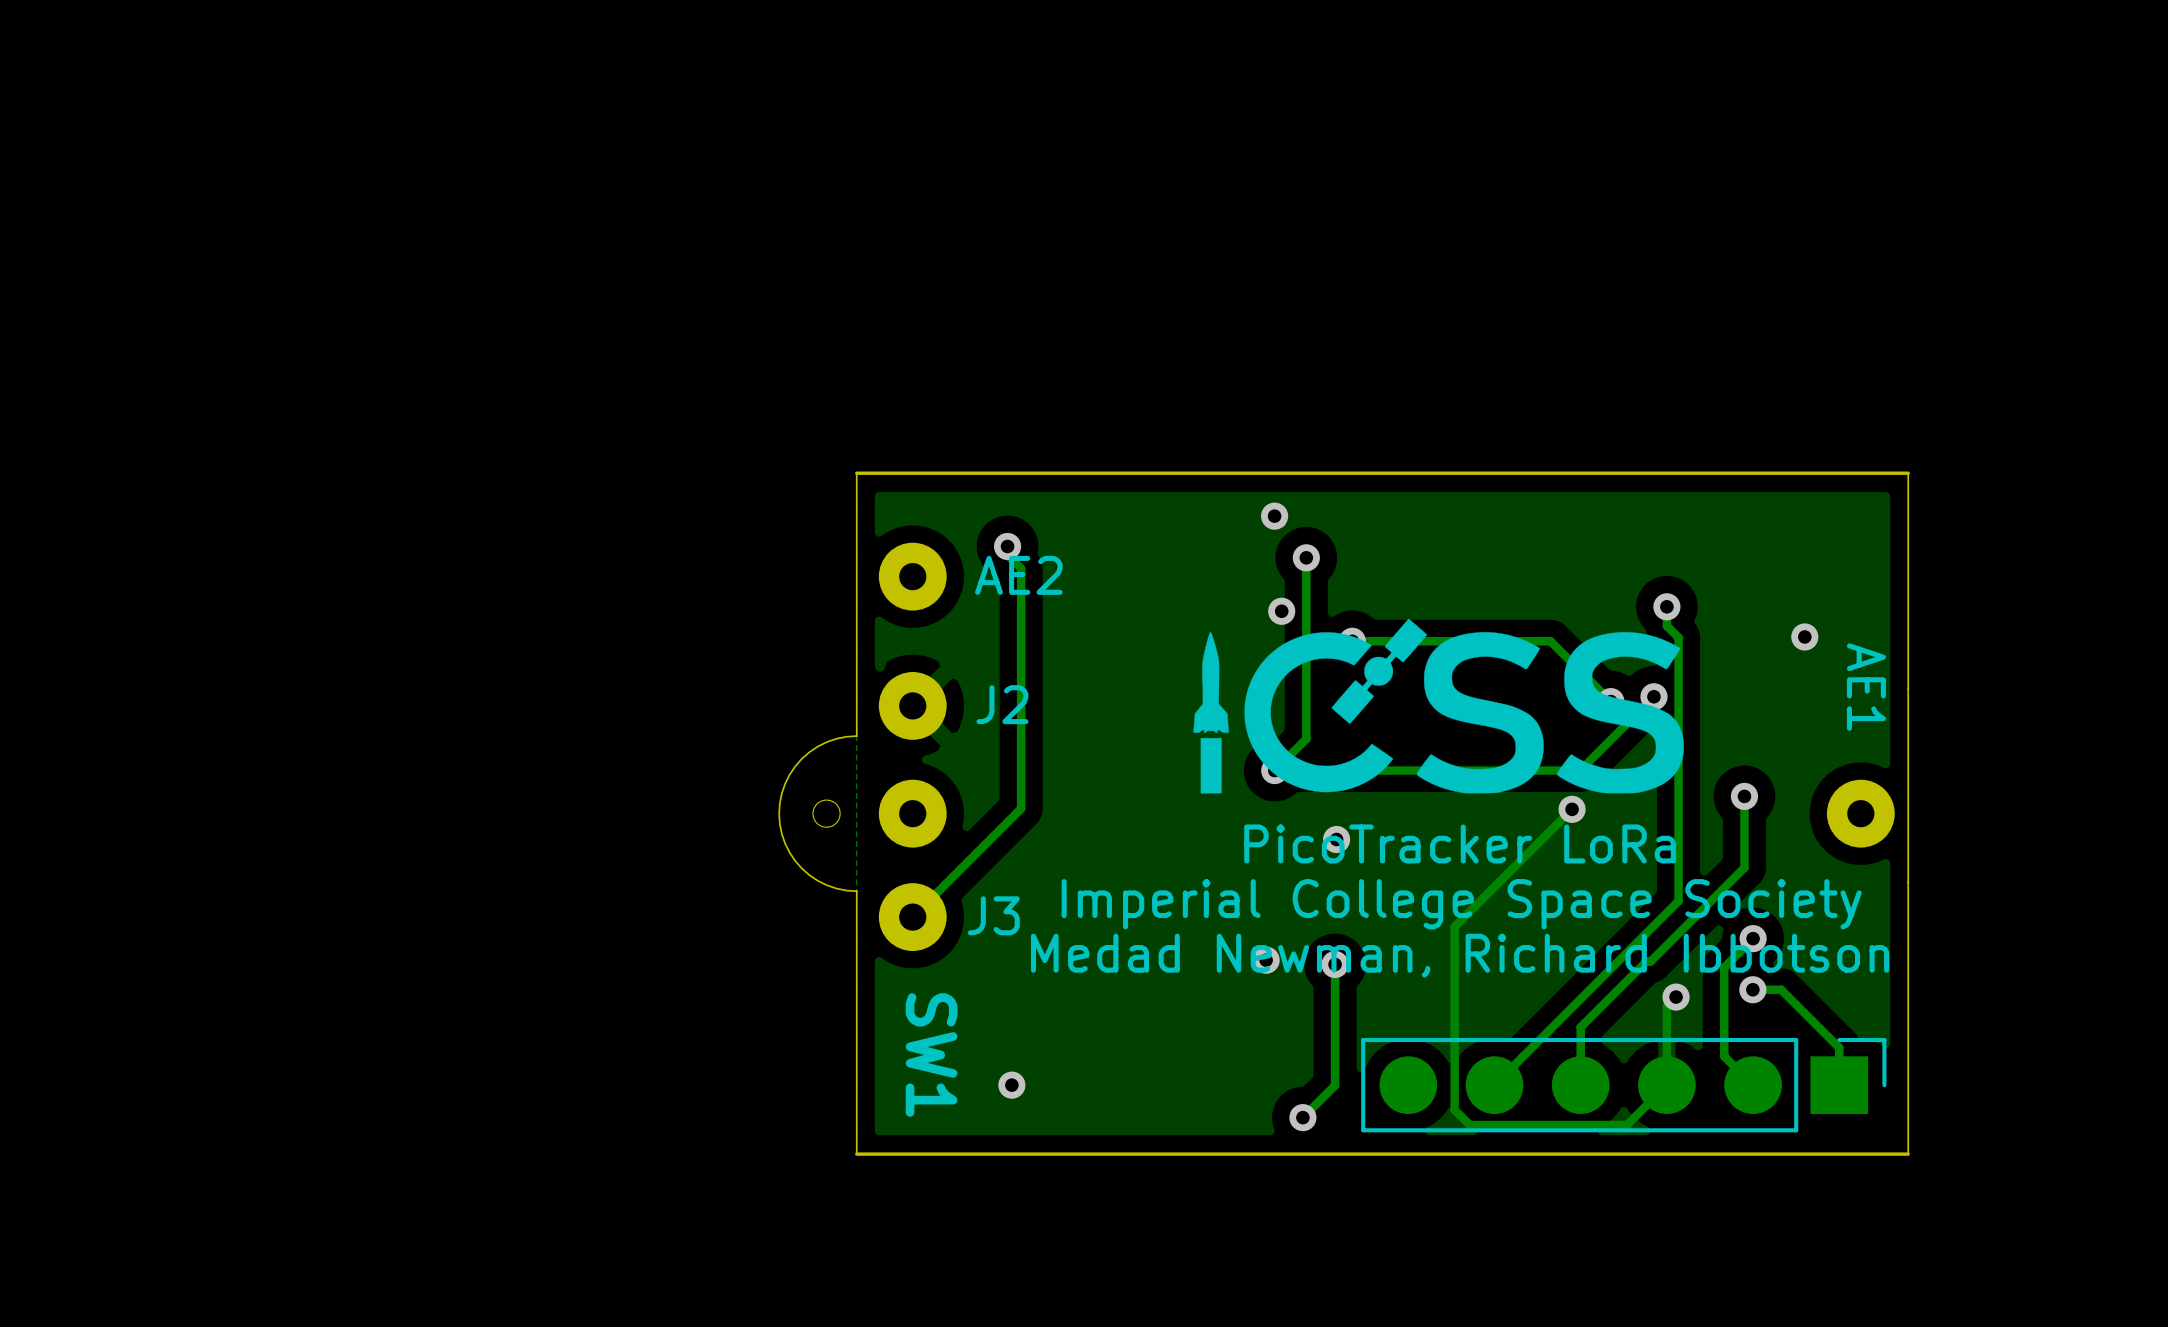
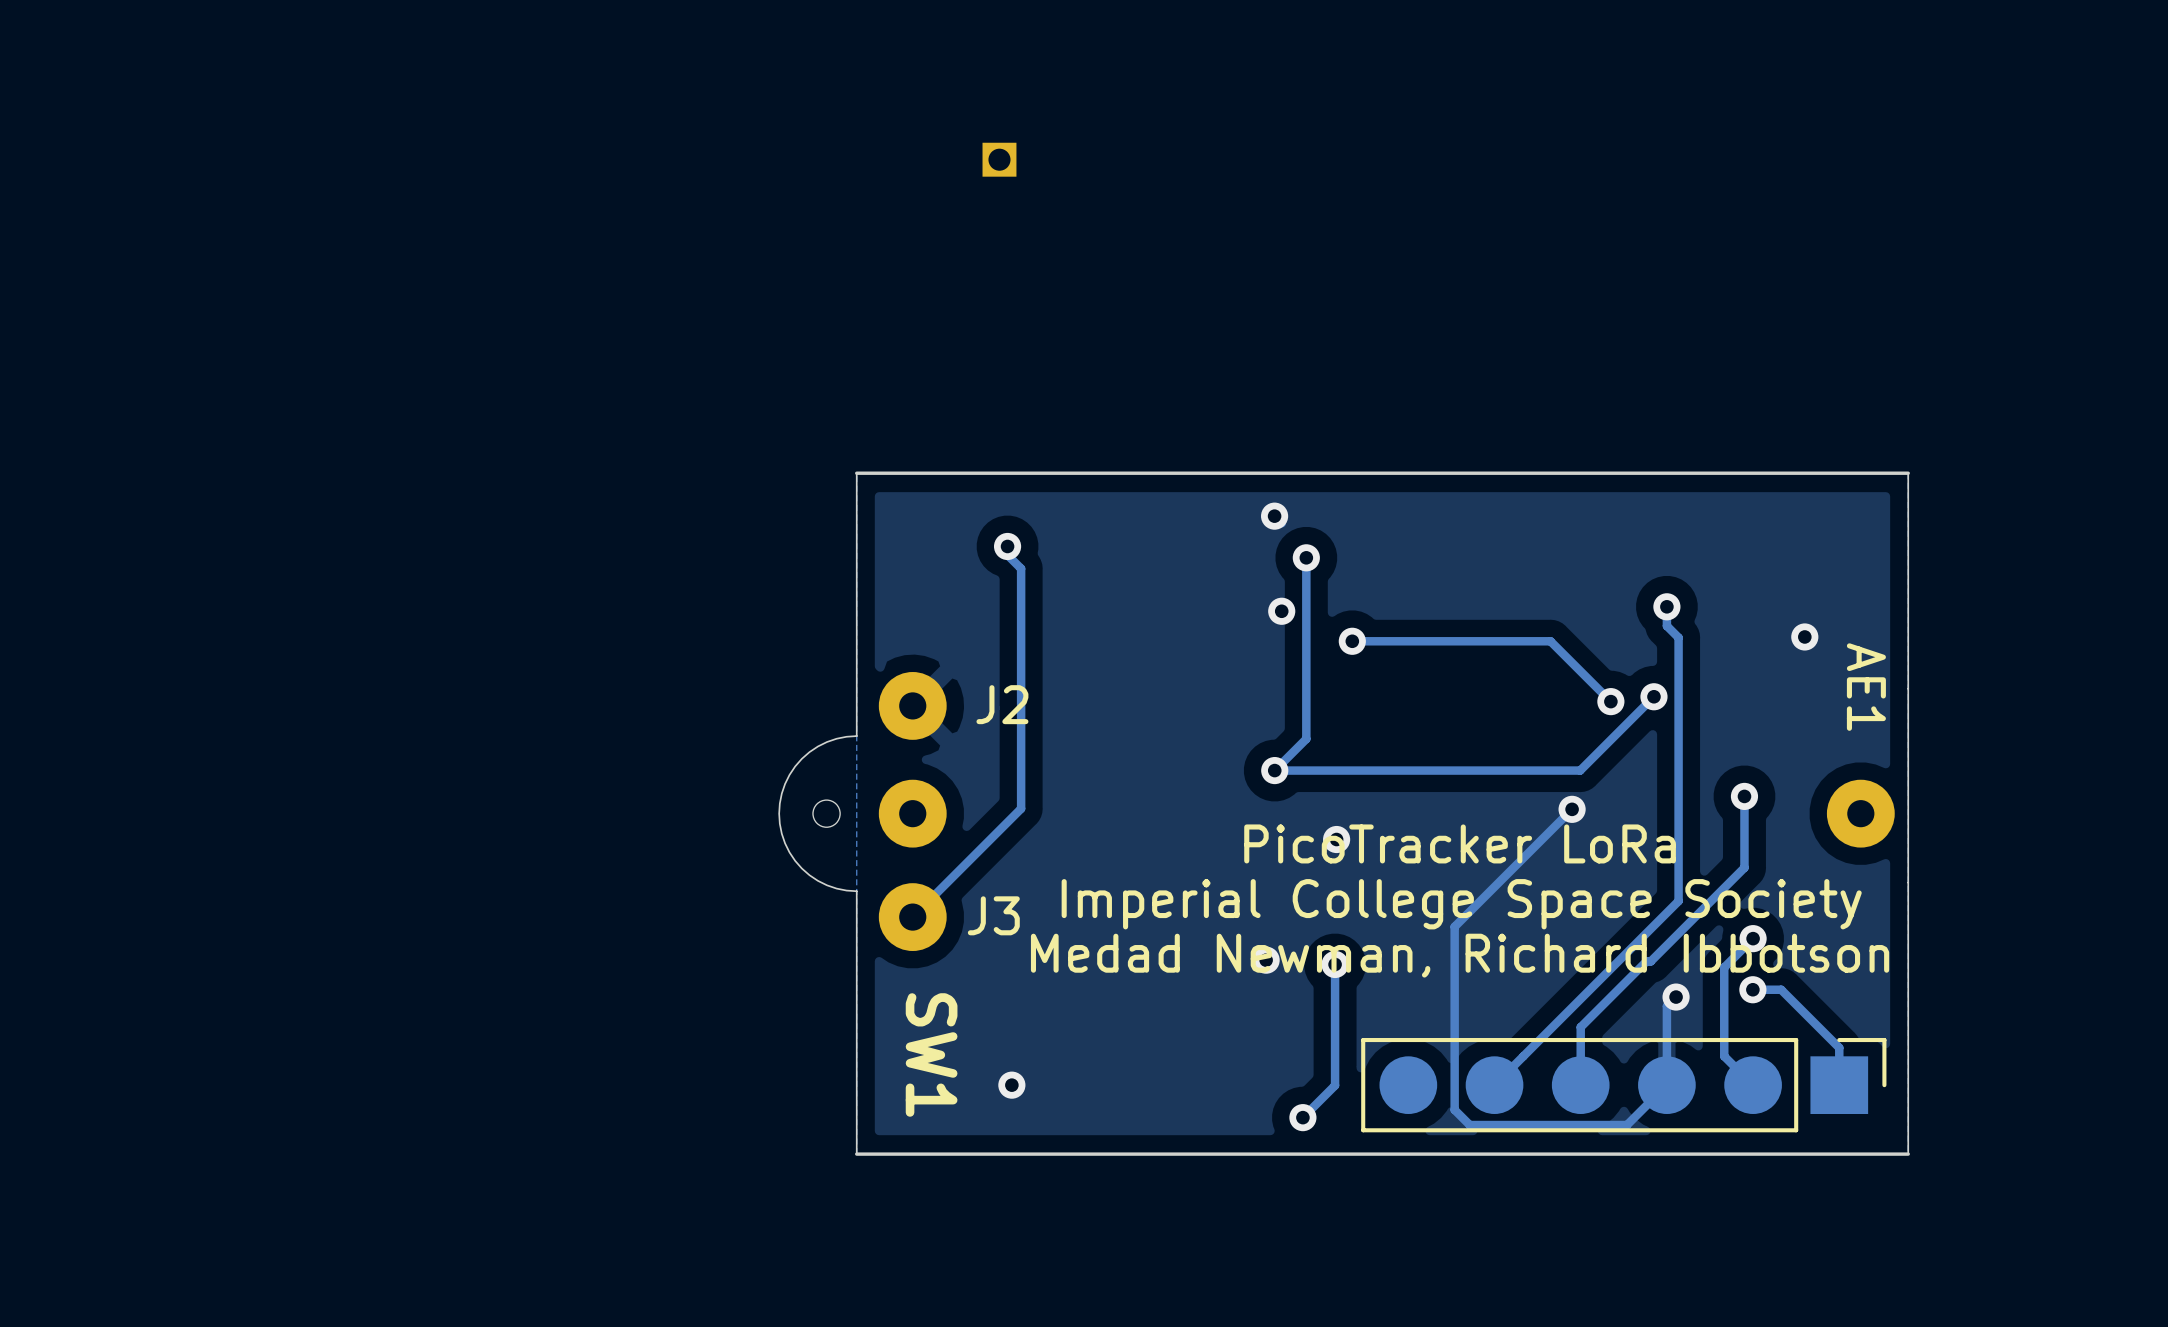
part: none -> (999, 159)
AE2: (912, 576) -> none
drawing: [1193, 618, 1684, 794] -> none

